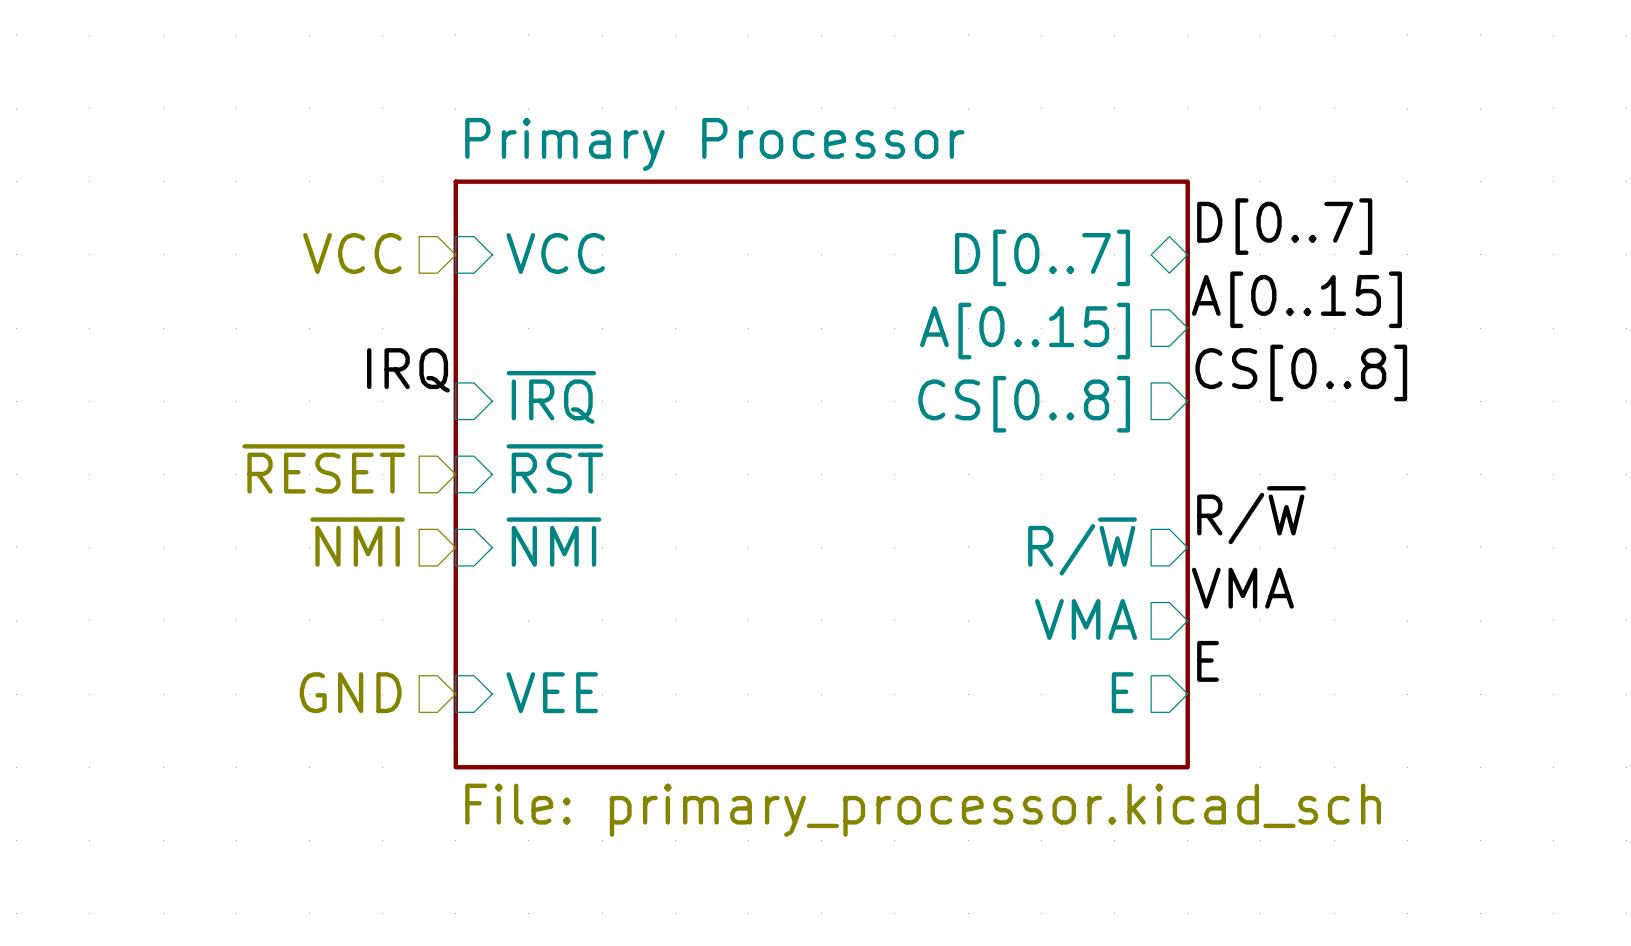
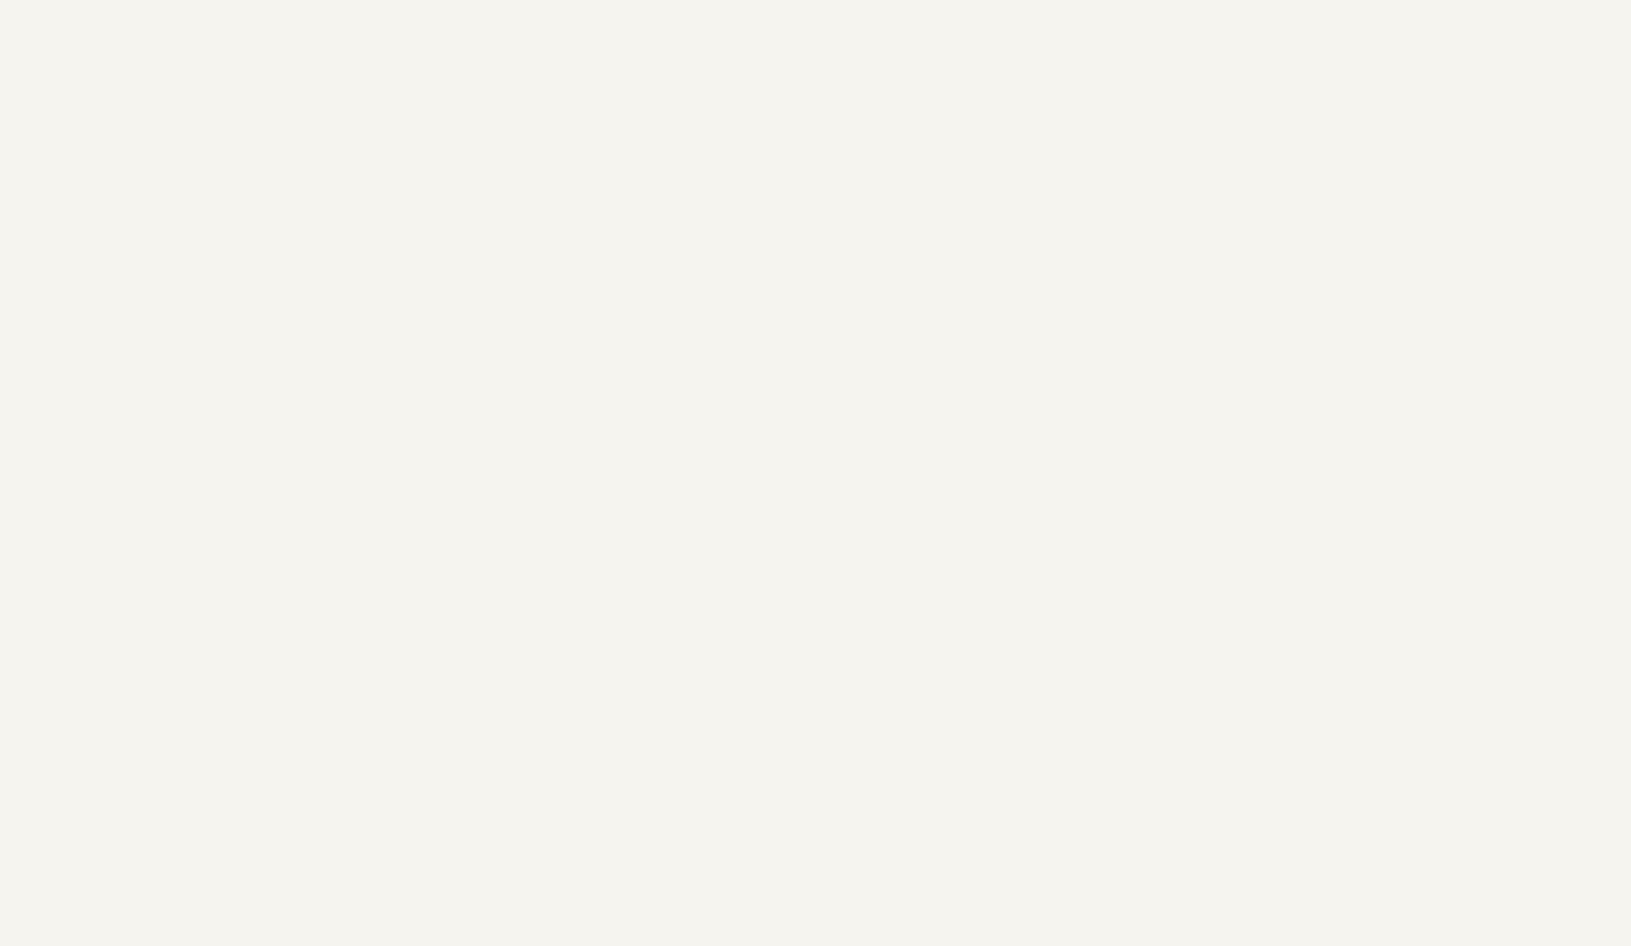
label: D[0..7] (1284, 226) -> none
hierarchical label: VCC (352, 253) -> none
sheet pin: VCC (555, 253) -> none
sheet pin: D[0..7] (1042, 257) -> none
label: A[0..15] (1296, 299) -> none
sheet pin: A[0..15] (1025, 331) -> none
label: IRQ (408, 370) -> none
label: CS[0..8] (1301, 372) -> none
sheet pin: ~{IRQ} (551, 397) -> none
sheet pin: CS[0..8] (1024, 404) -> none
hierarchical label: ~{RESET} (323, 468) -> none
sheet pin: ~{RST} (554, 468) -> none
sheet Primary Processor: File: primary_processor.kicad_sch (821, 474) -> none
label: R/~{W} (1251, 515) -> none
hierarchical label: ~{NMI} (357, 542) -> none
sheet pin: ~{NMI} (553, 542) -> none
sheet pin: R/~{W} (1082, 546) -> none
label: VMA (1242, 588) -> none
sheet pin: VMA (1086, 619) -> none
label: E (1208, 661) -> none
hierarchical label: GND (350, 692) -> none
sheet pin: VEE (552, 692) -> none
sheet pin: E (1122, 692) -> none

